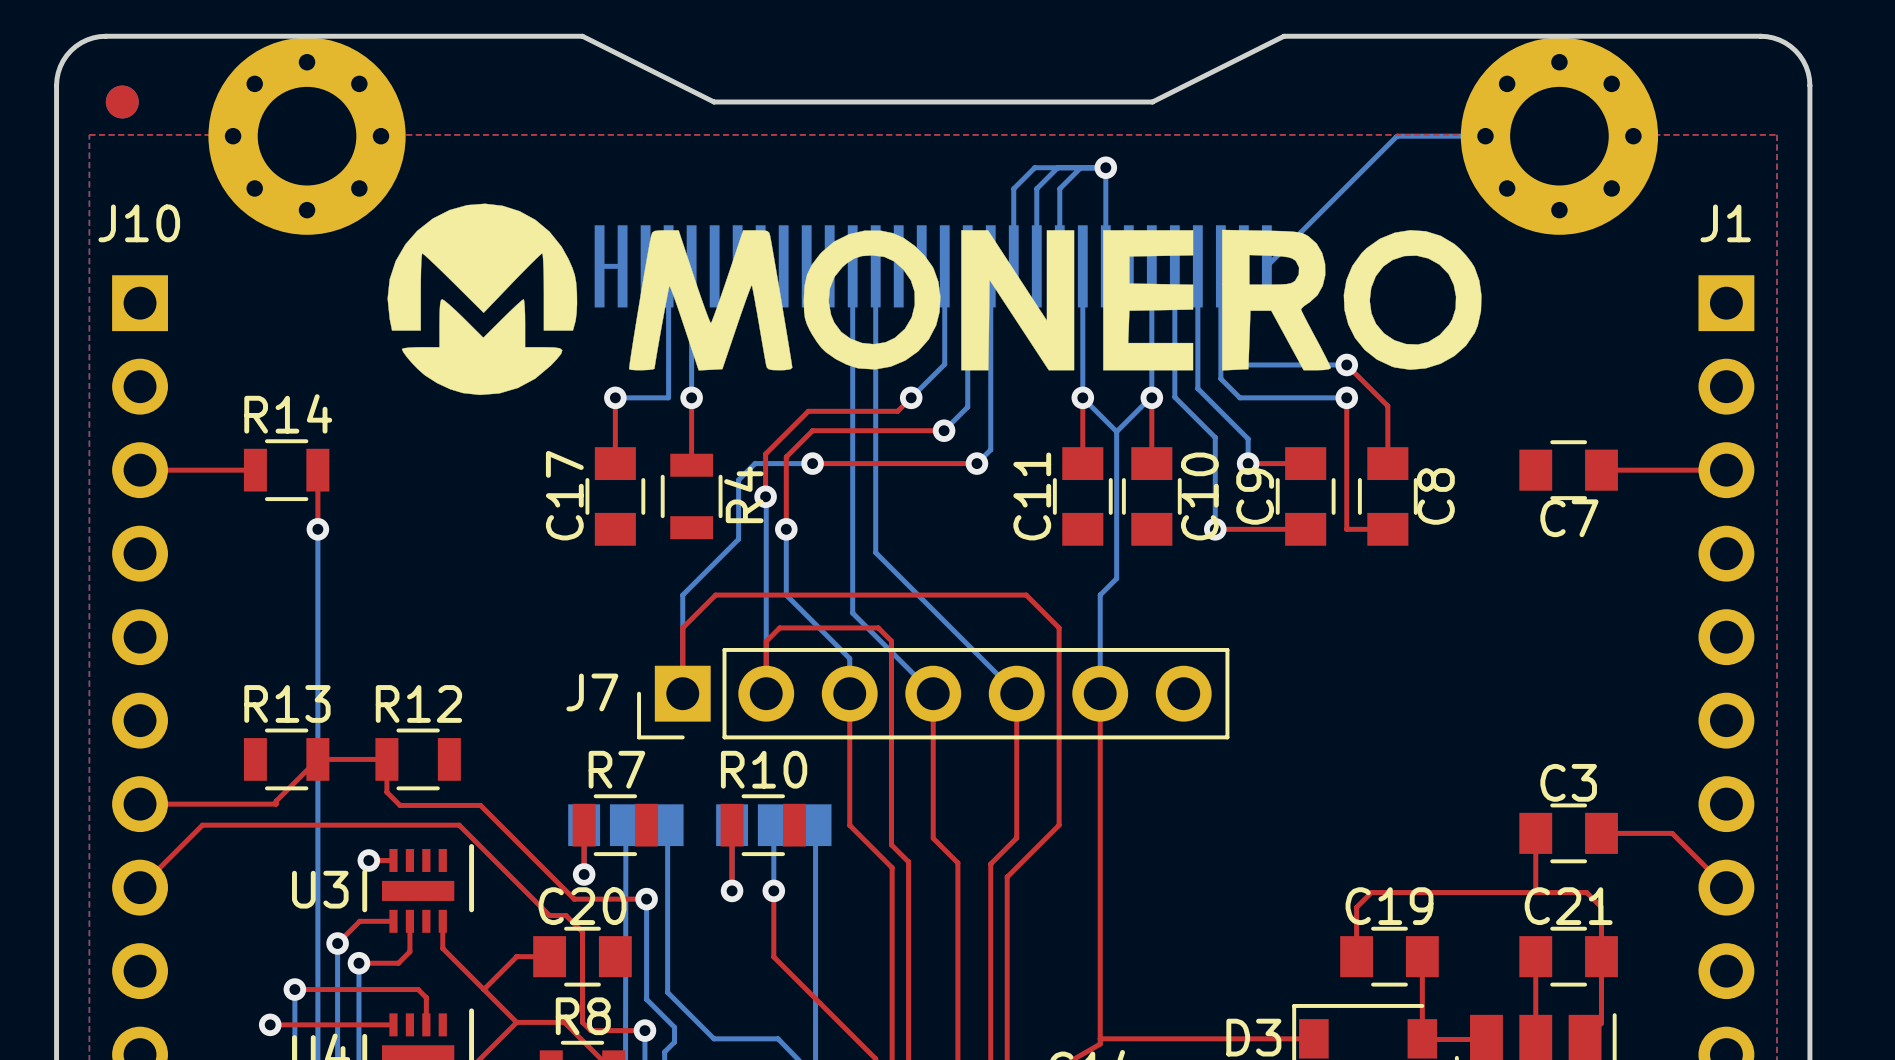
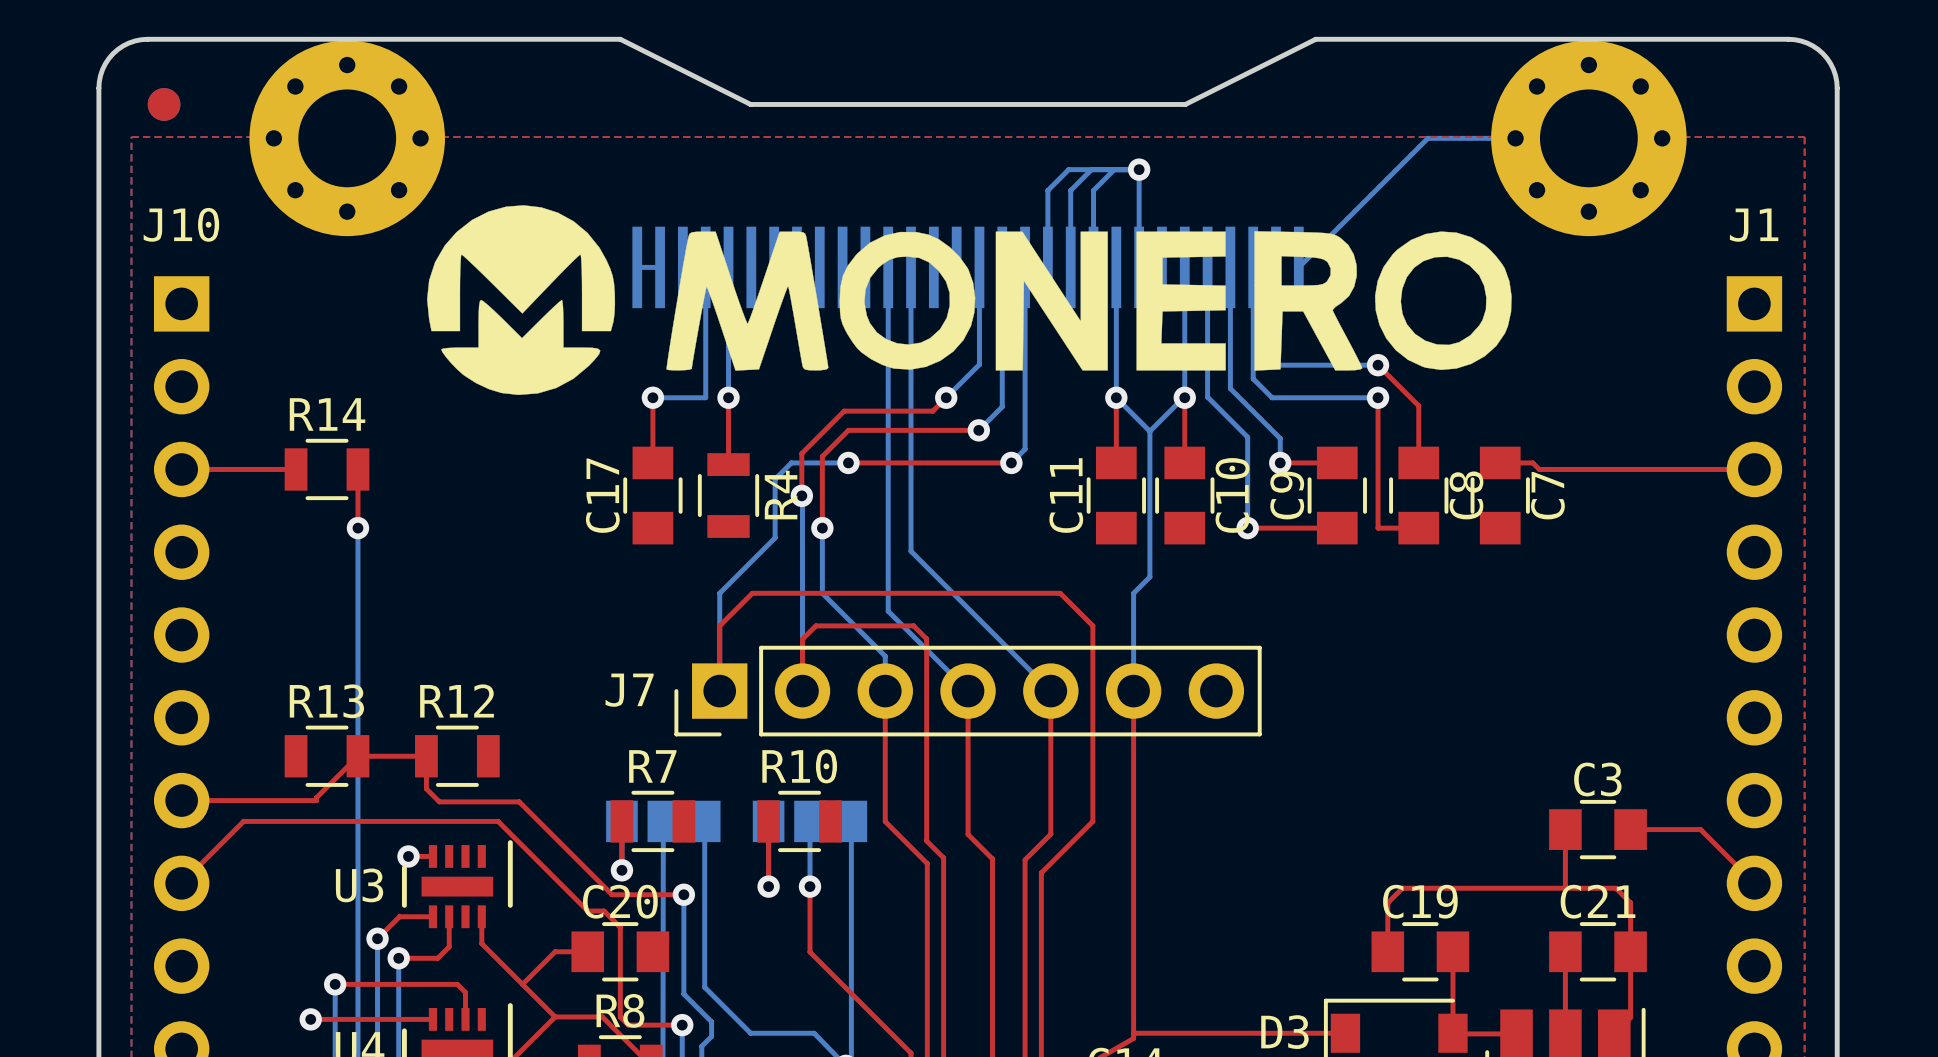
top track: none -> (1500, 462) (1532, 462) (1539, 469) (1630, 469)
C7 rotation: 0° (1568, 470) -> 90° clockwise (1500, 495)
C7 position: (1568, 470) -> (1500, 495)
C7 name position: C7 (1569, 518) -> C7 (1547, 495)

